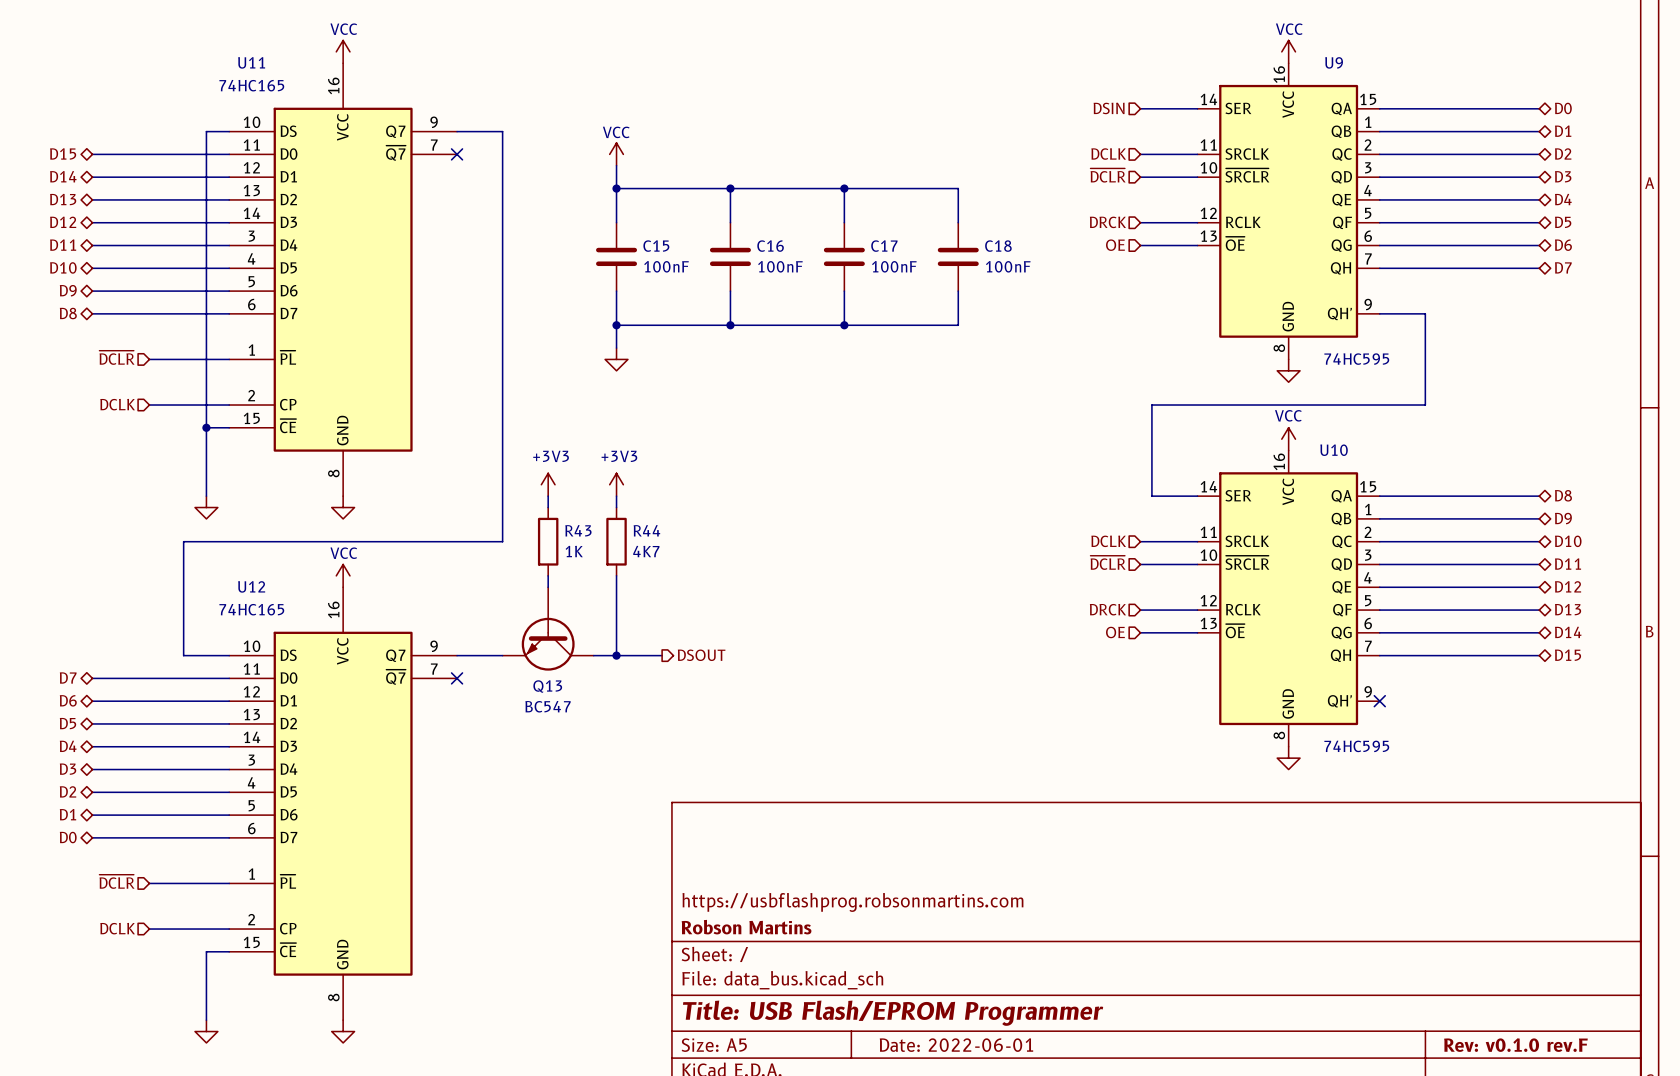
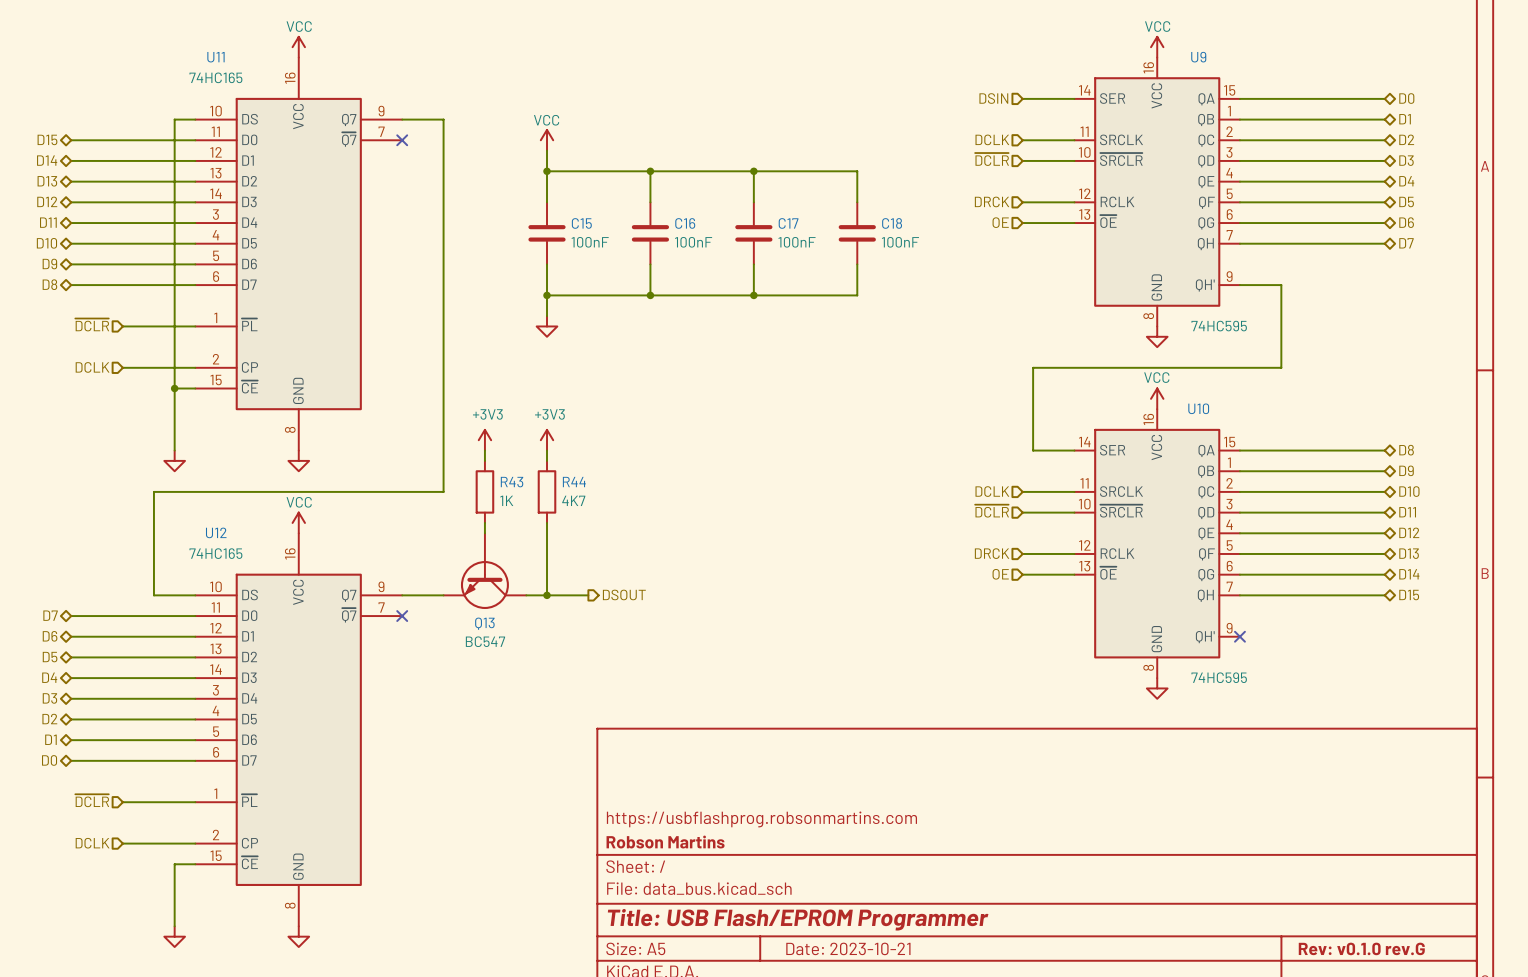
title block: Date: 2022-06-01 (956, 1045) -> Date: 2023-10-21 (848, 948)
title block: Rev: v0.1.0 rev.F (1515, 1045) -> Rev: v0.1.0 rev.G (1361, 948)

